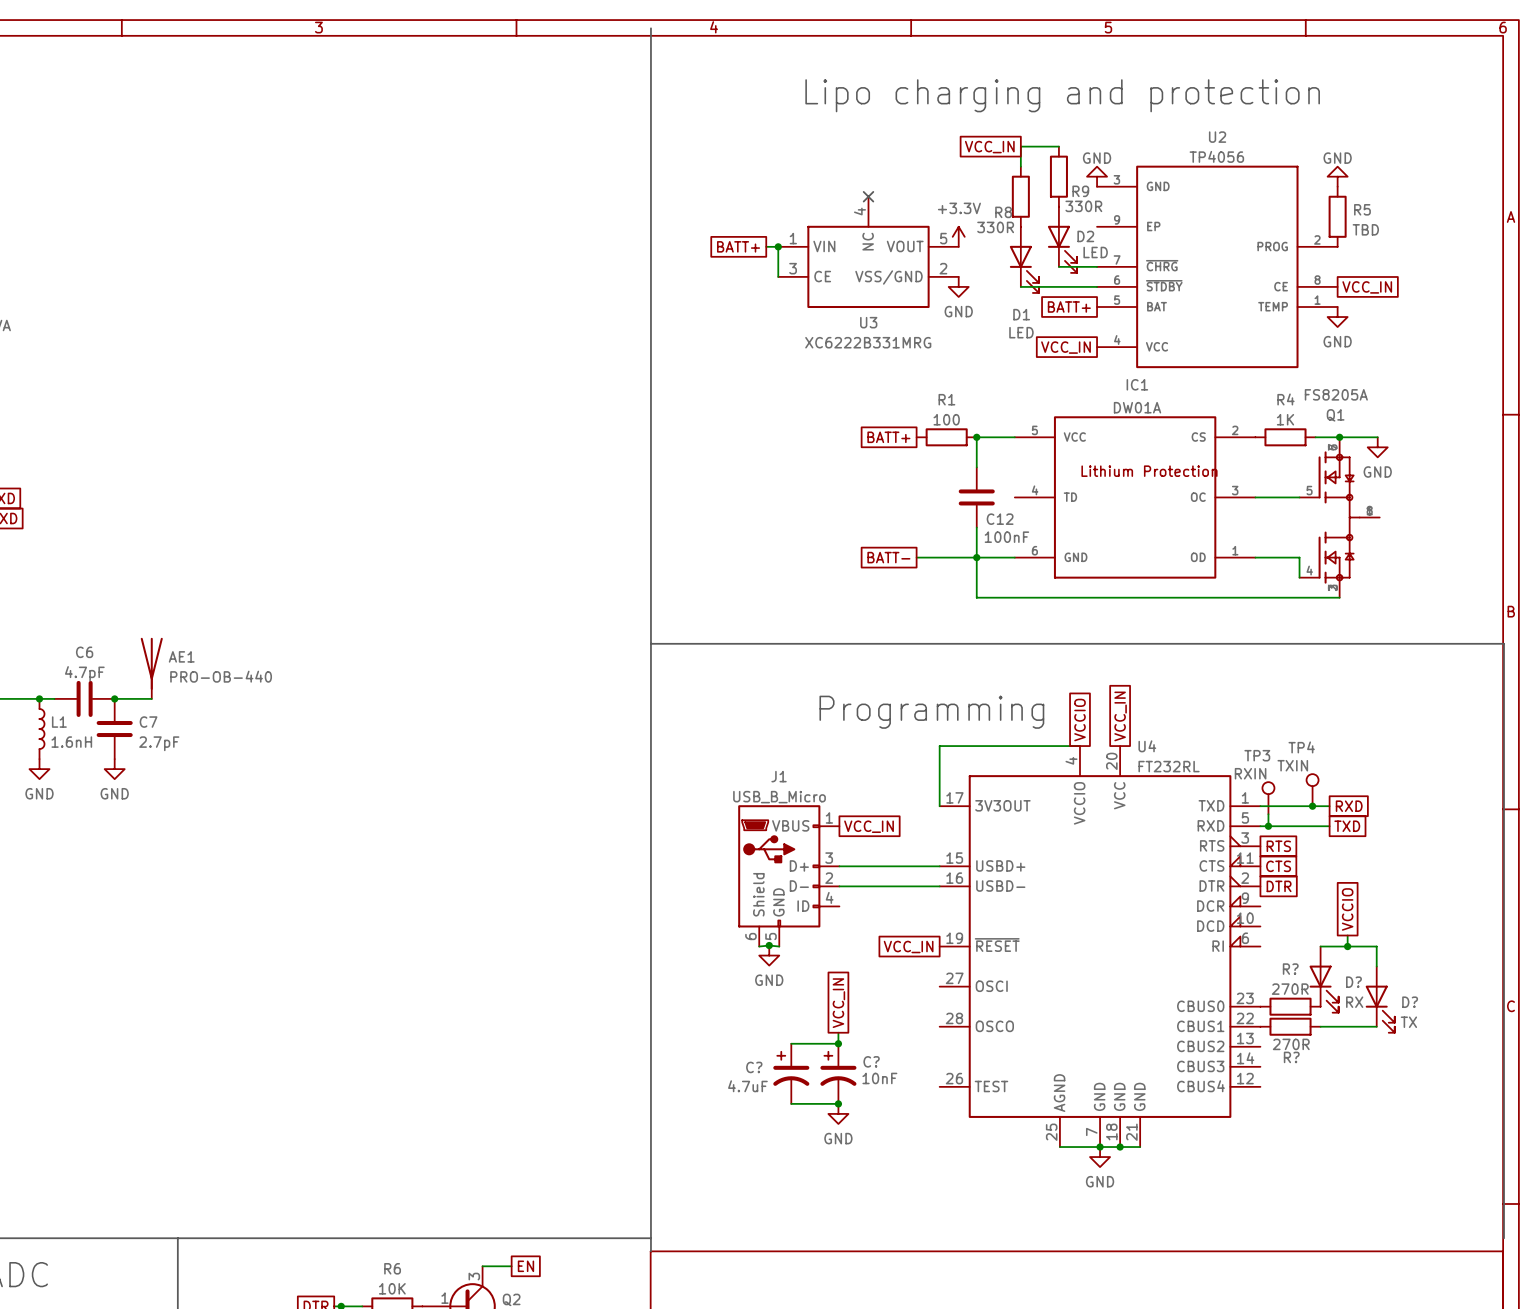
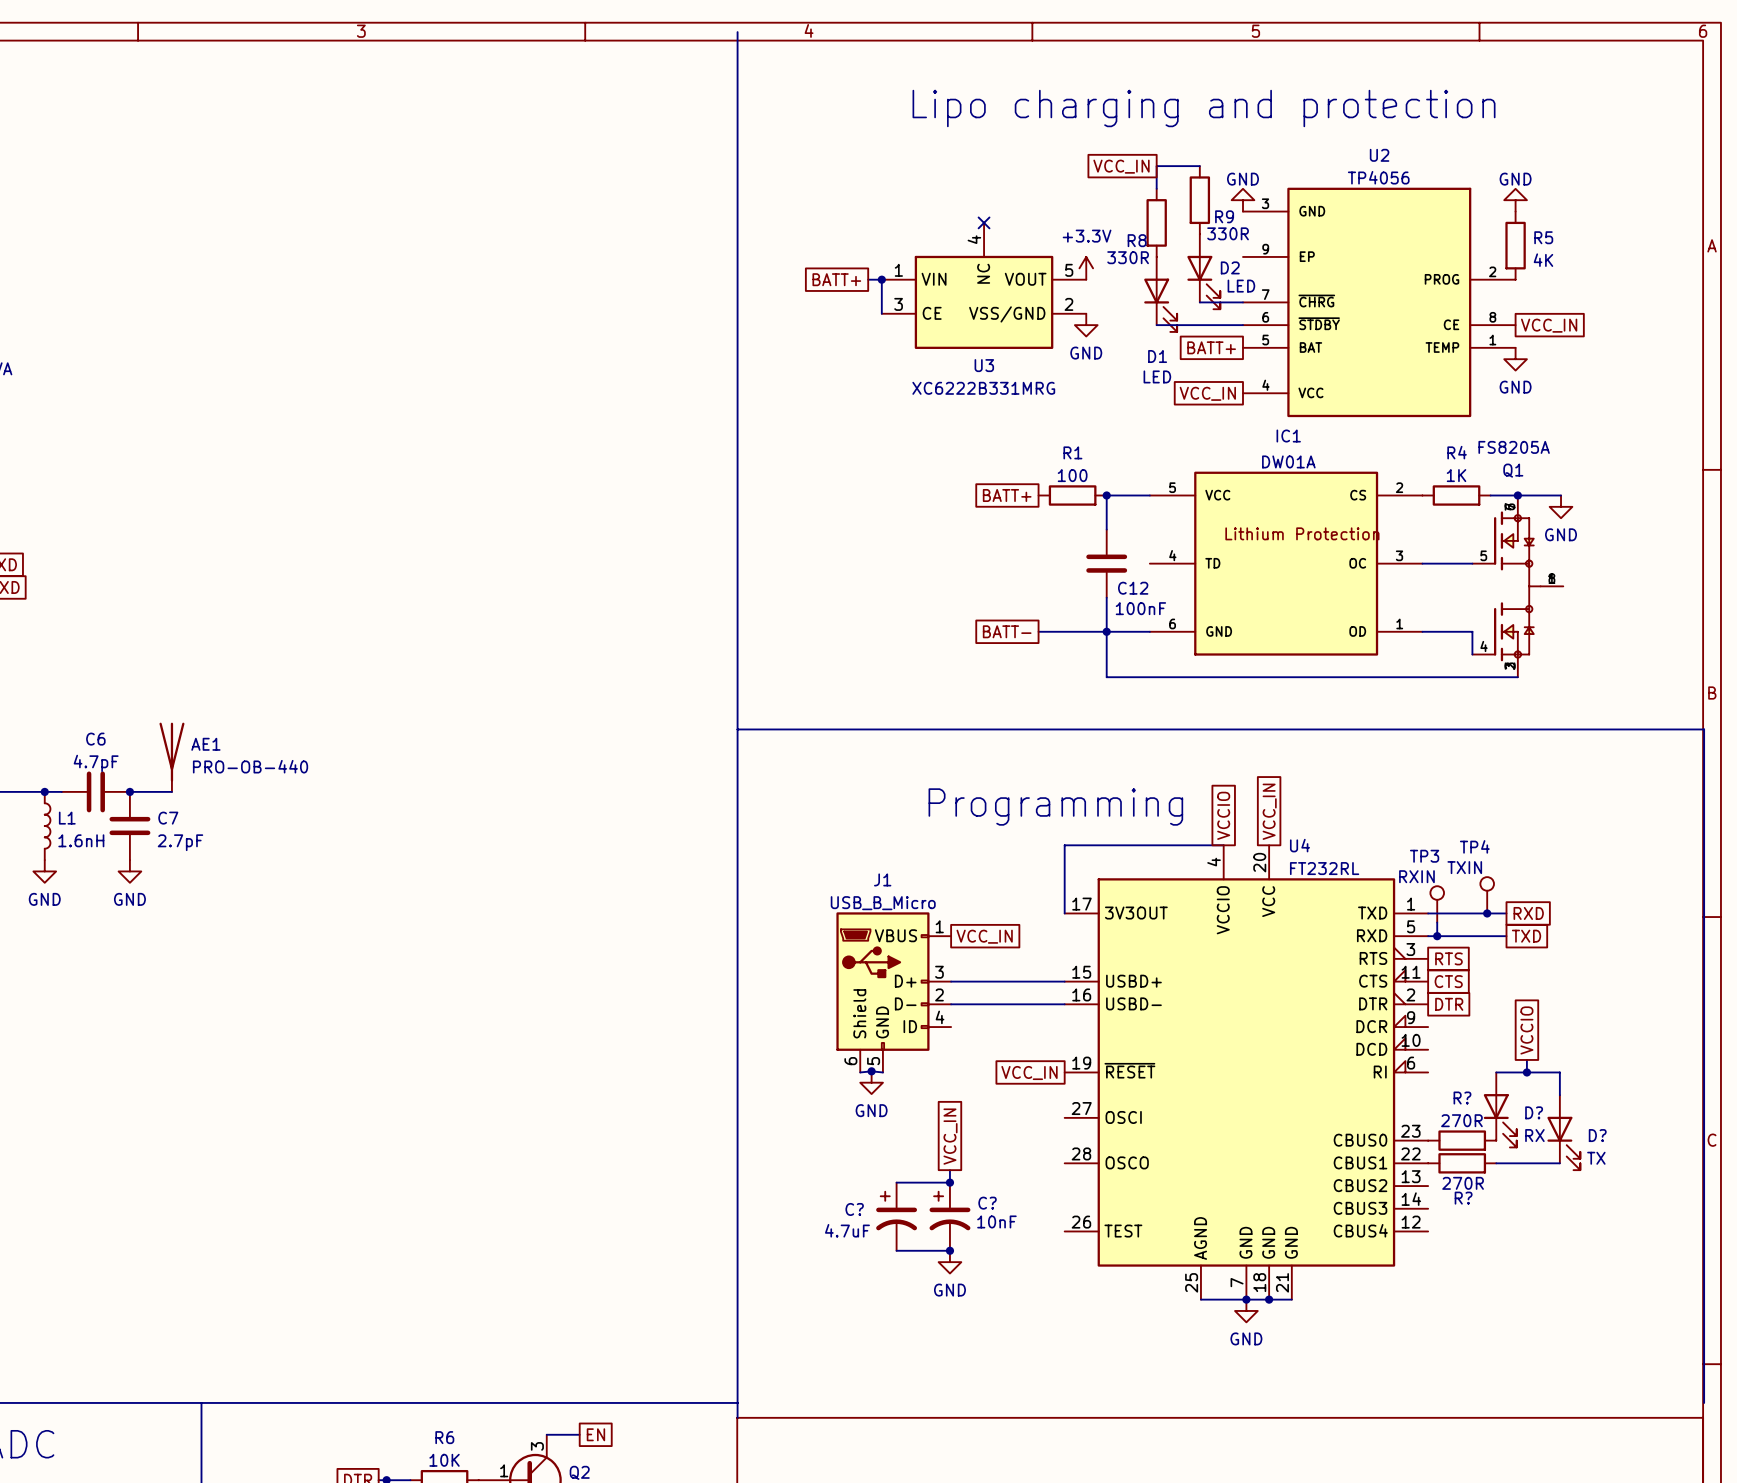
R5 value: TBD (1365, 229) -> 4K (1543, 260)

